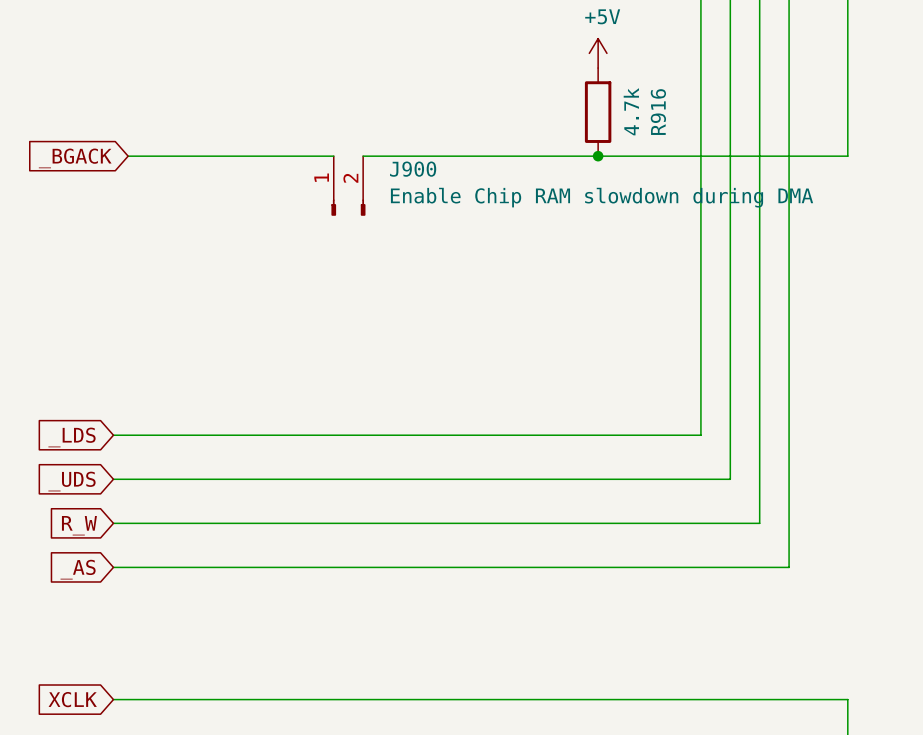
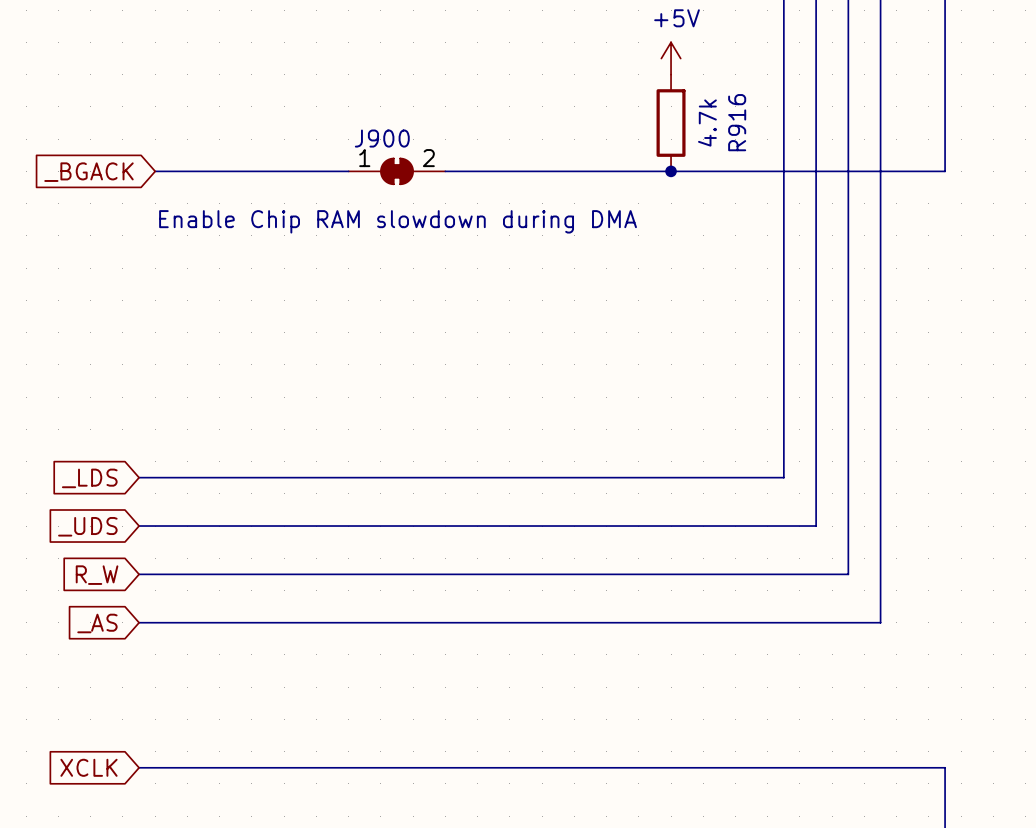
J900 symbol: [331, 156, 366, 216] -> [348, 158, 446, 185]
J900 name position: J900 (413, 169) -> J900 (382, 138)
J900 value position: Enable Chip RAM slowdown during DMA (602, 197) -> Enable Chip RAM slowdown during DMA (398, 221)

